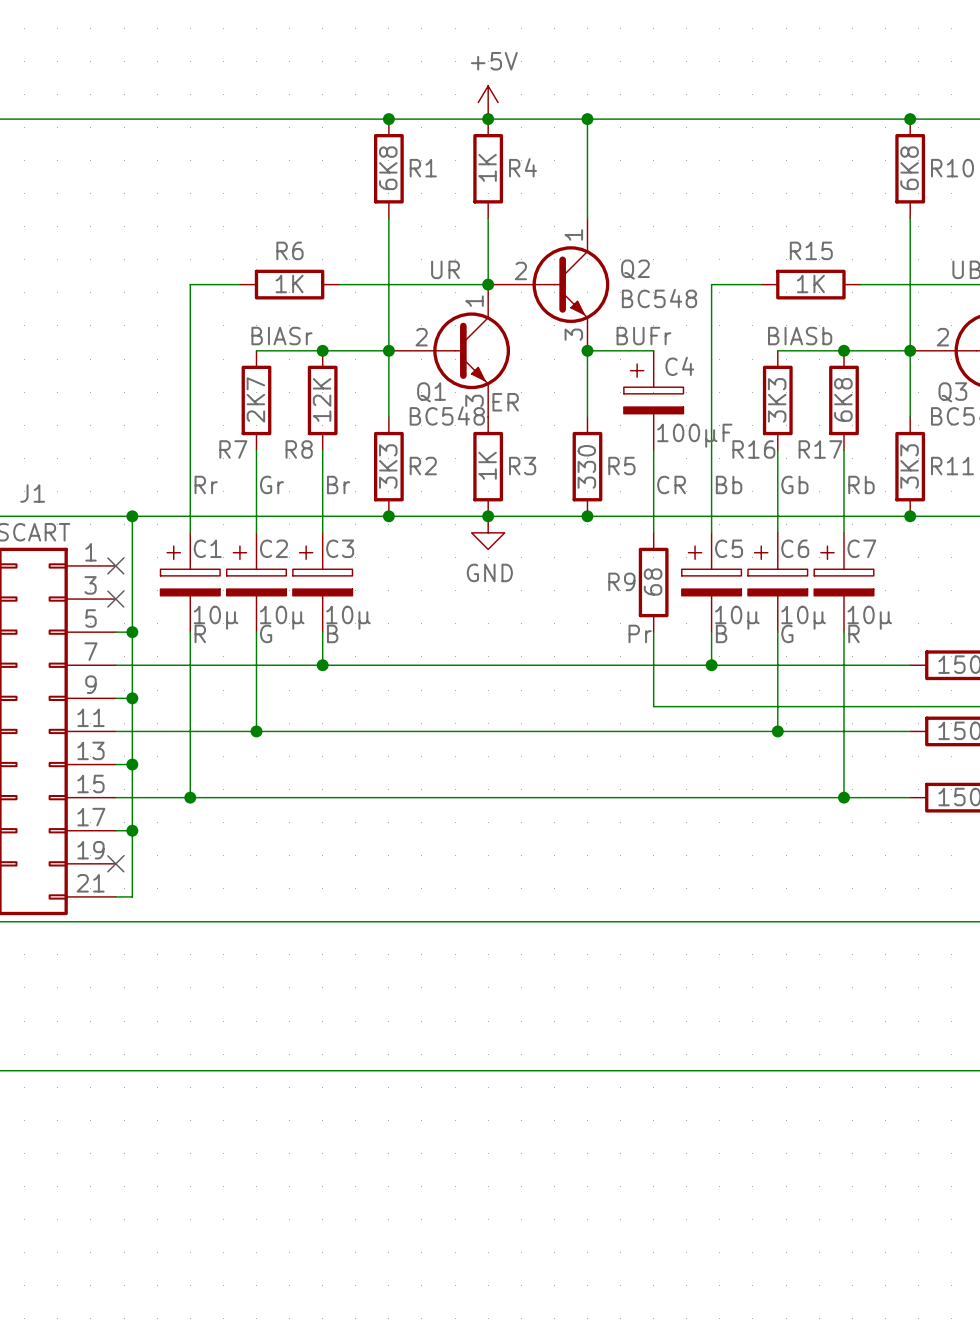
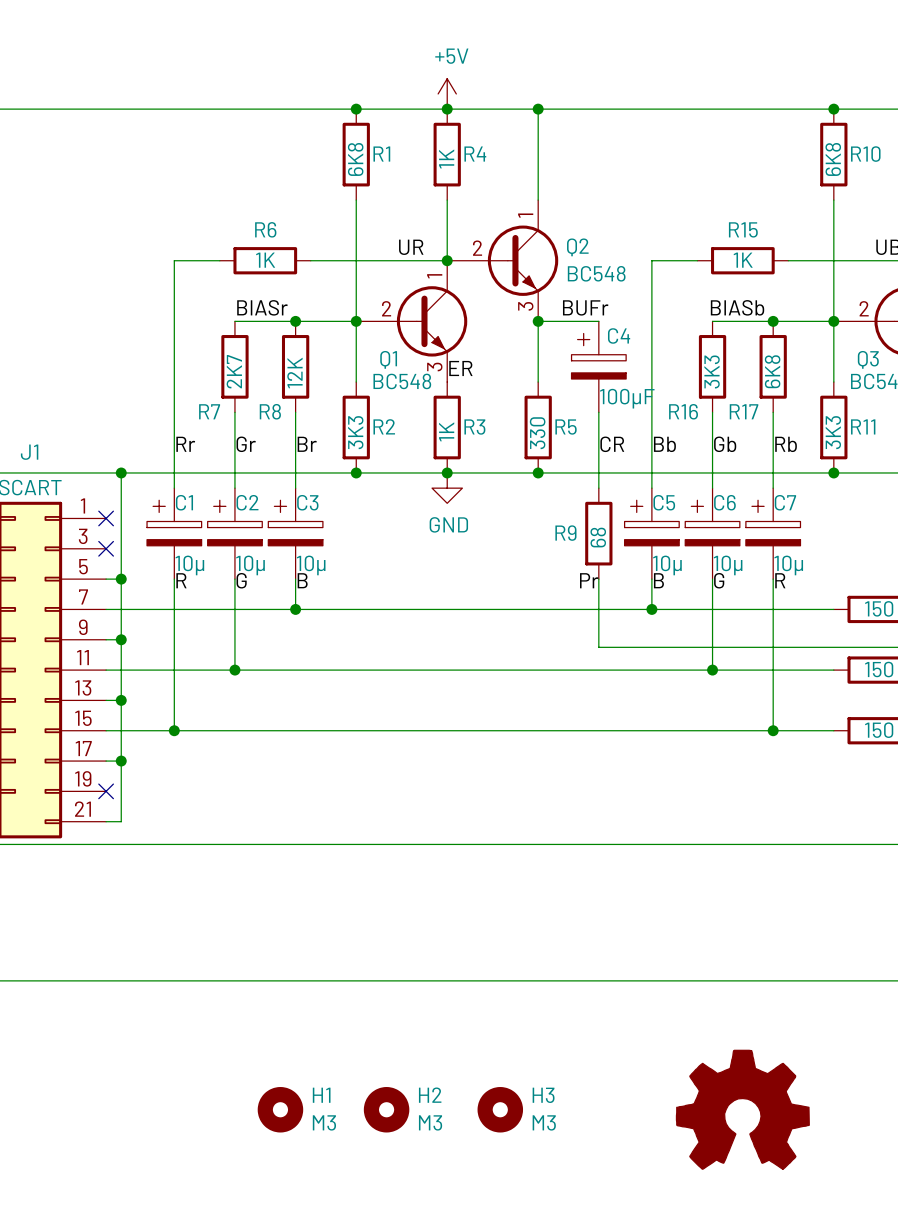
H1: none -> M3 (280, 1109)
H2: none -> M3 (386, 1109)
H3: none -> M3 (500, 1109)
part: none -> (742, 1109)

